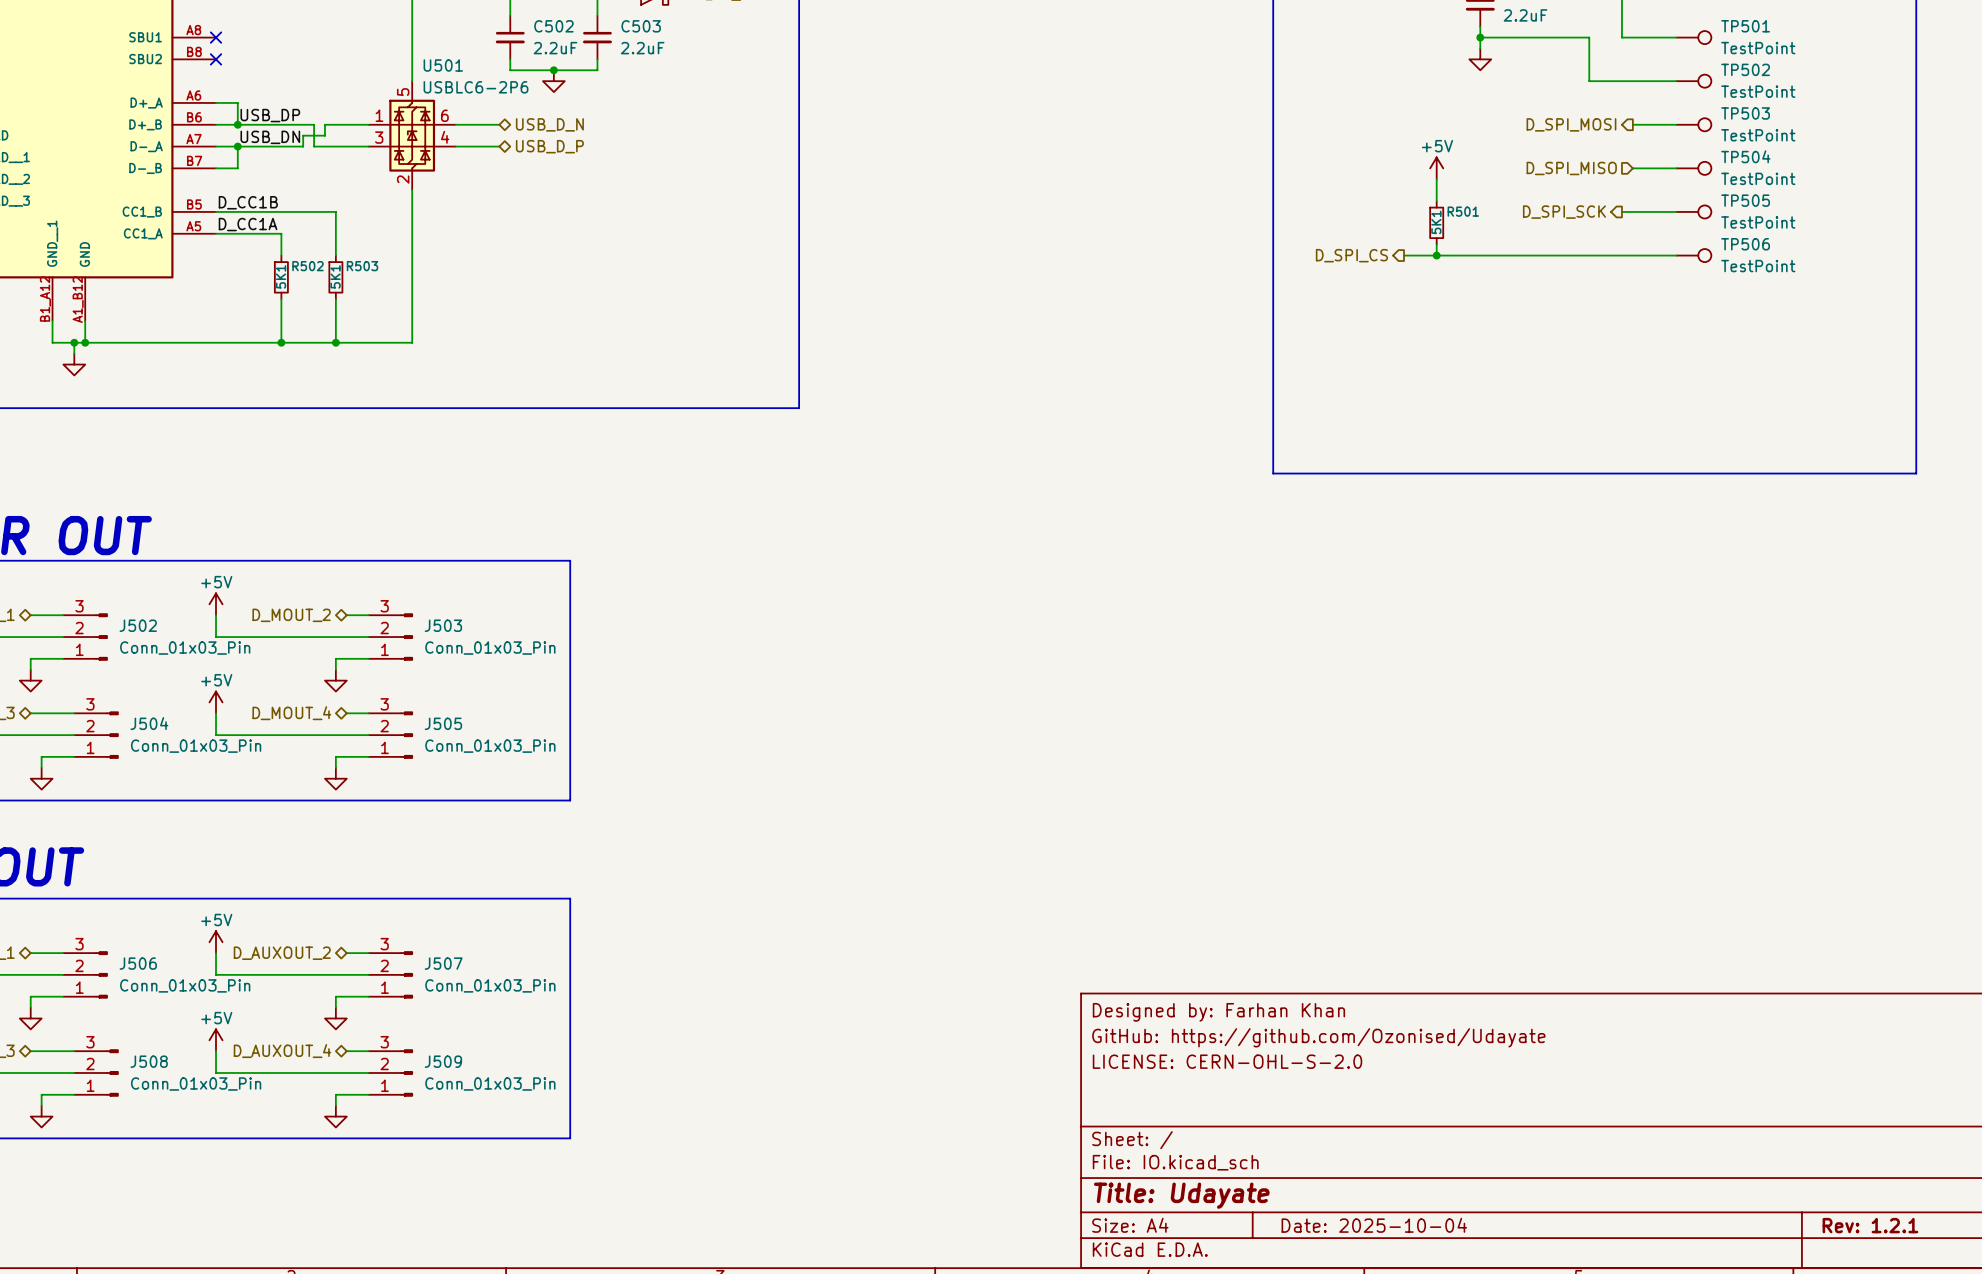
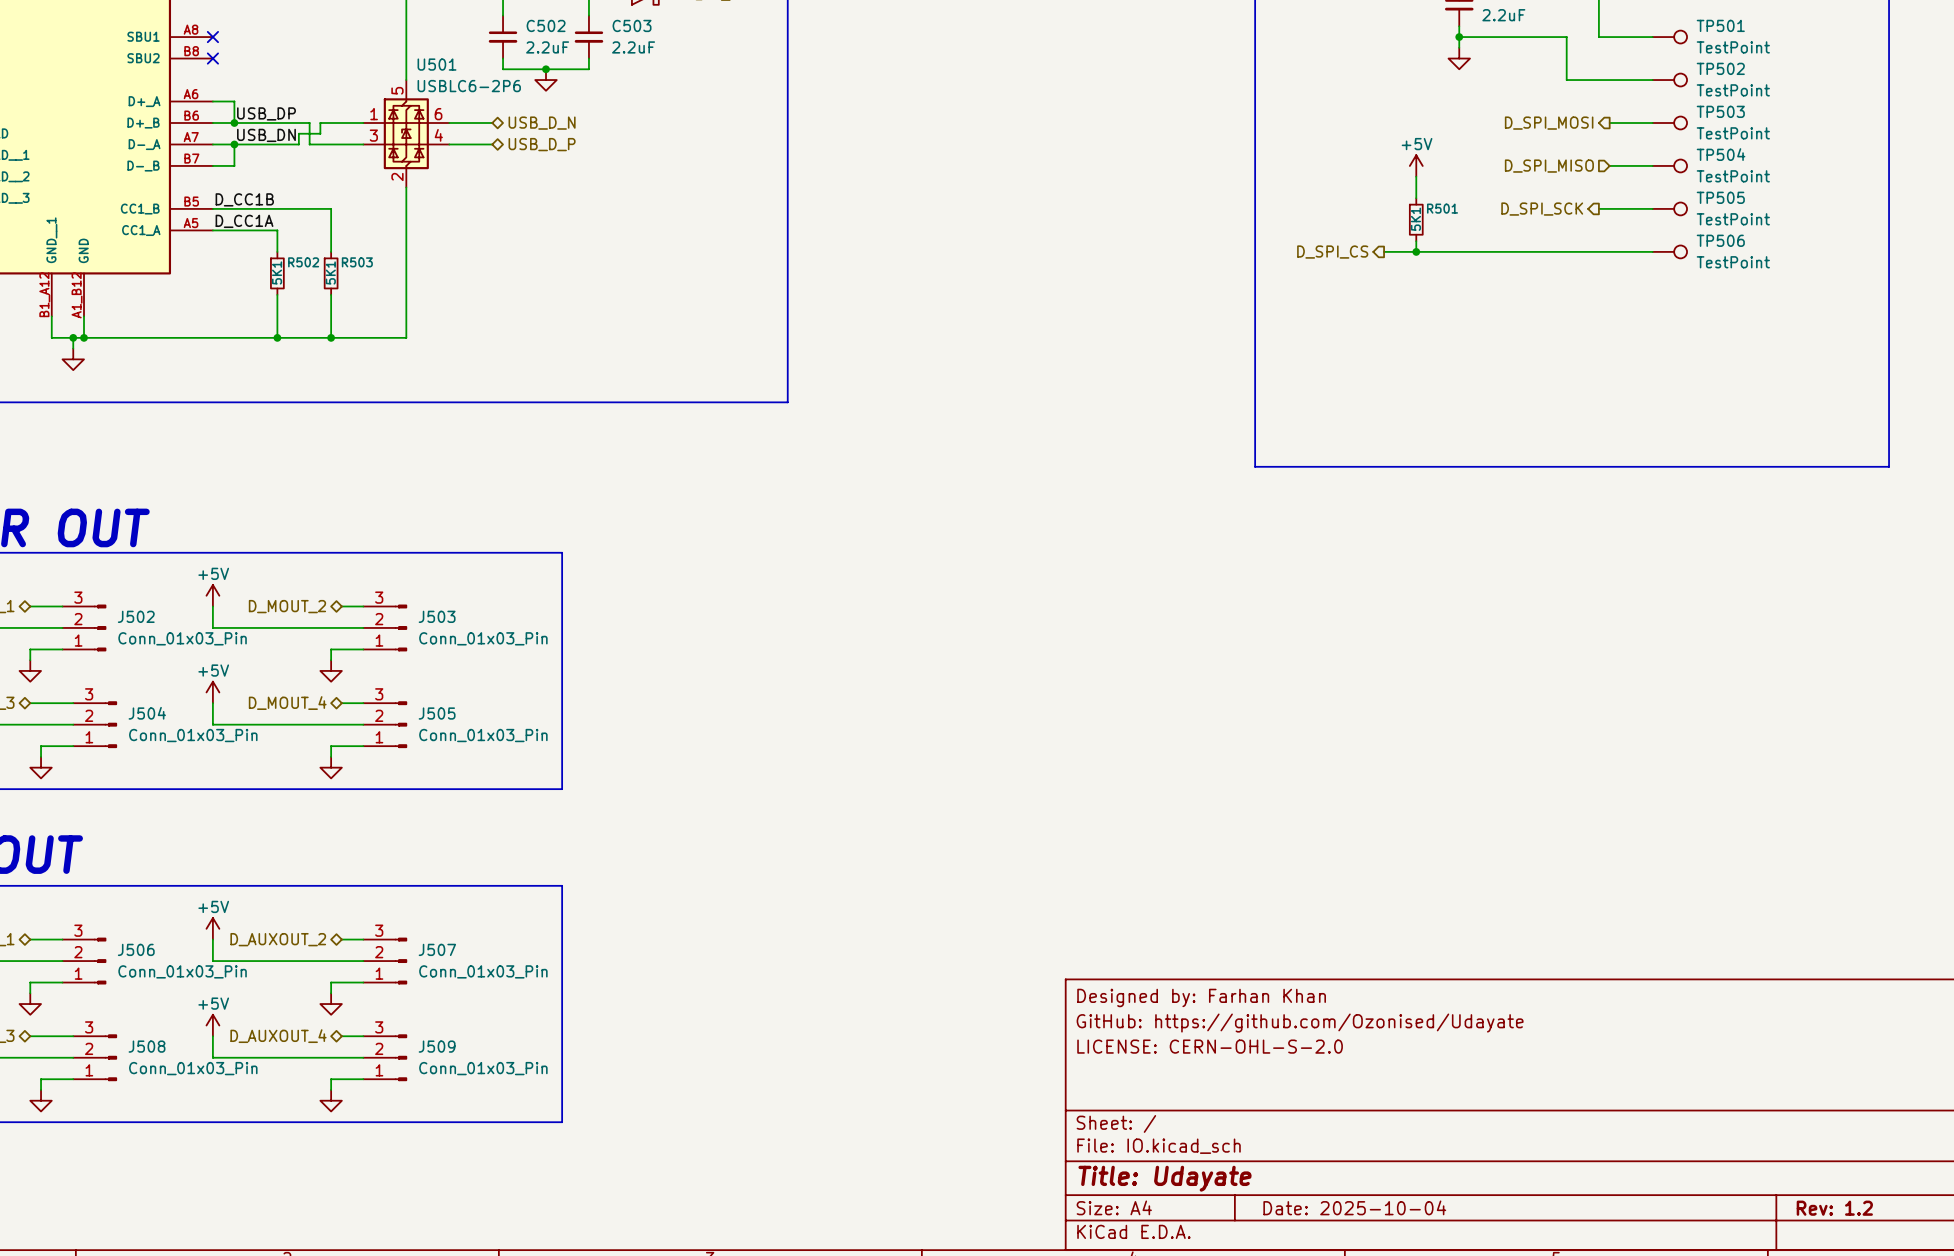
title block: Rev: 1.2.1 (1870, 1225) -> Rev: 1.2 (1834, 1208)

